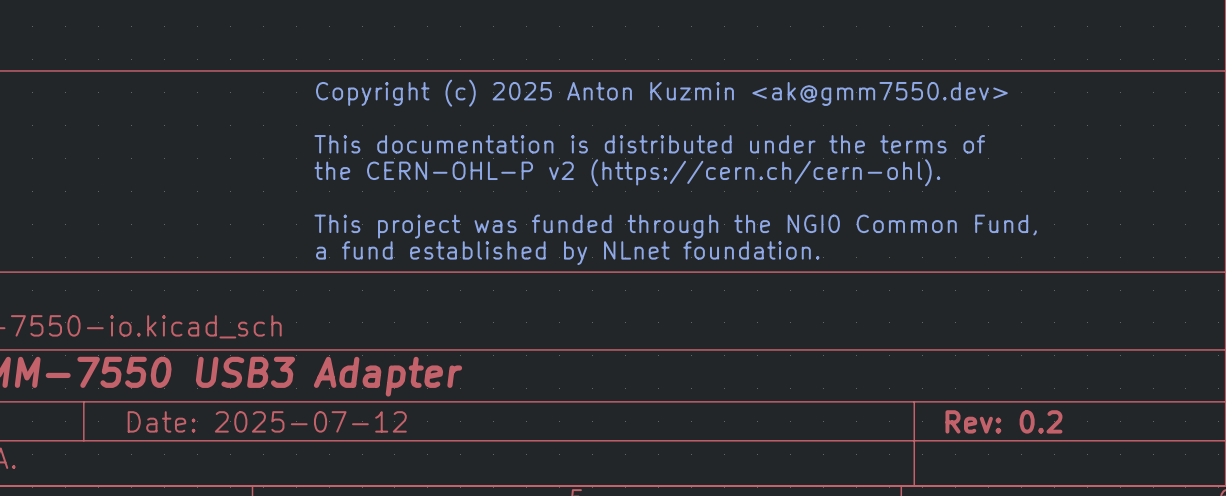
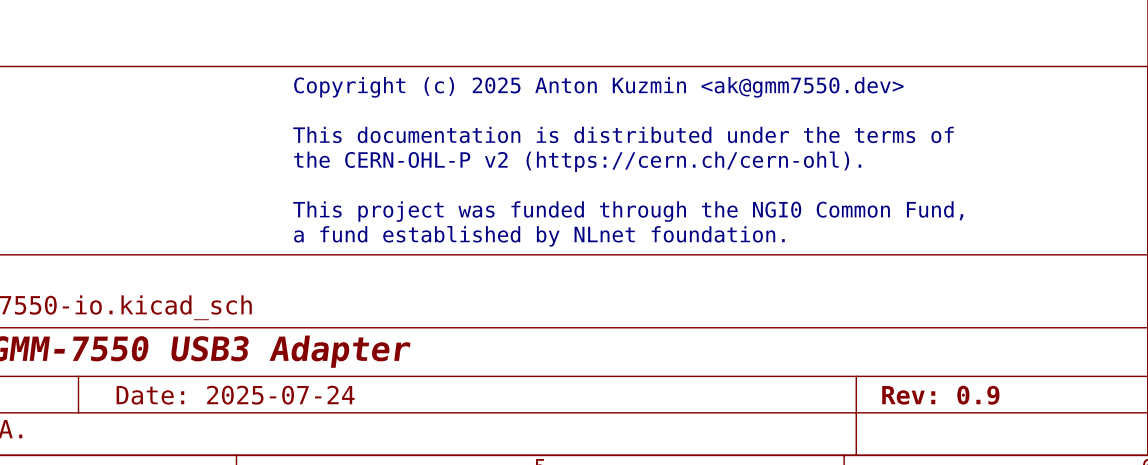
title block: Date: 2025-07-12 (267, 421) -> Date: 2025-07-24 (235, 395)
title block: Rev: 0.2 (1003, 421) -> Rev: 0.9 (940, 395)

